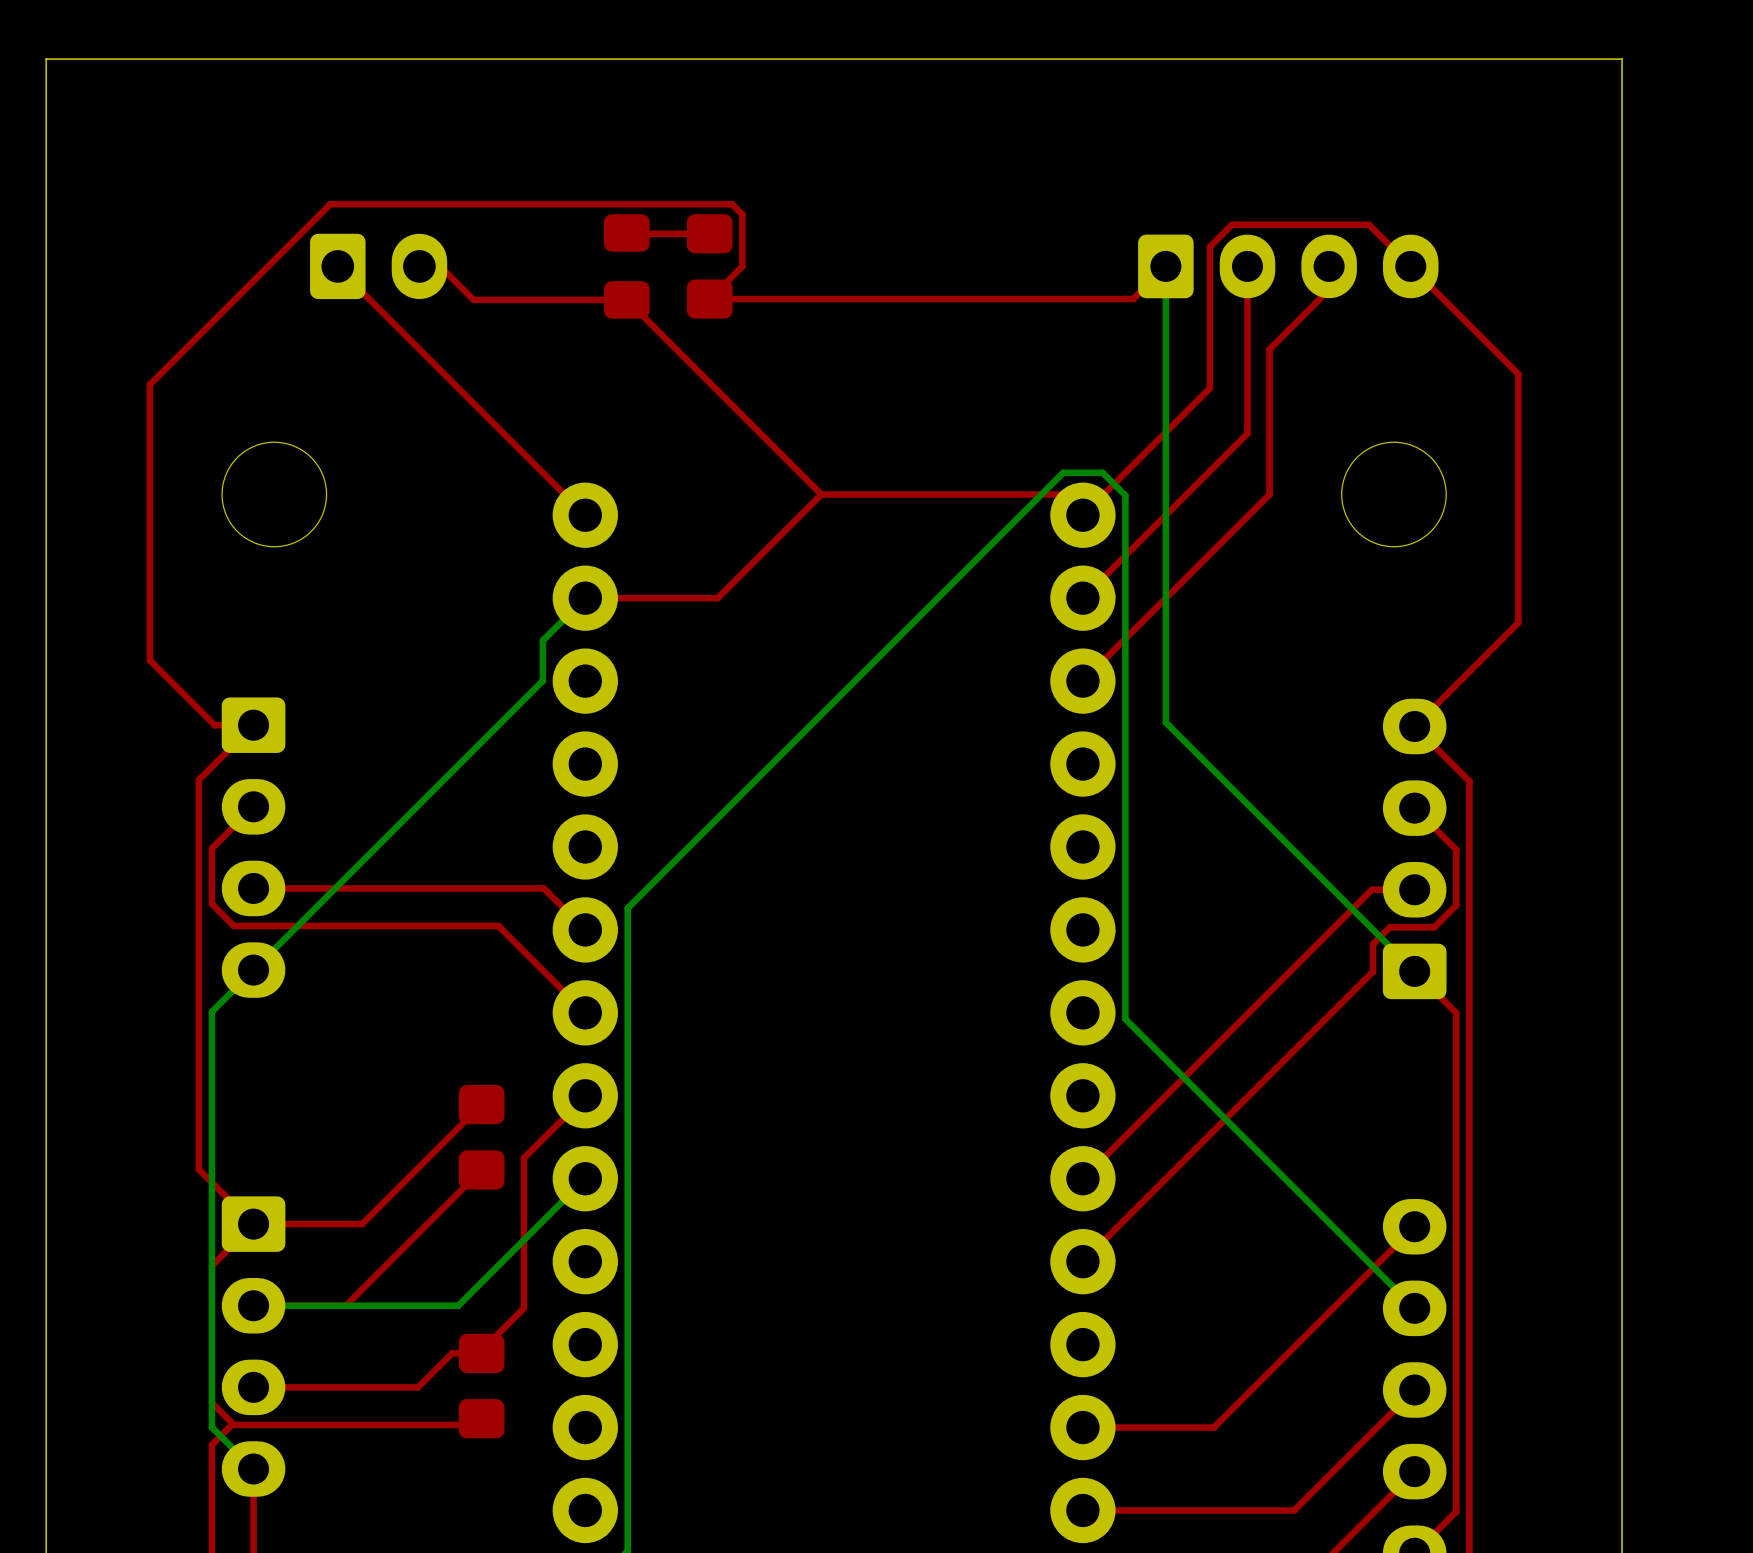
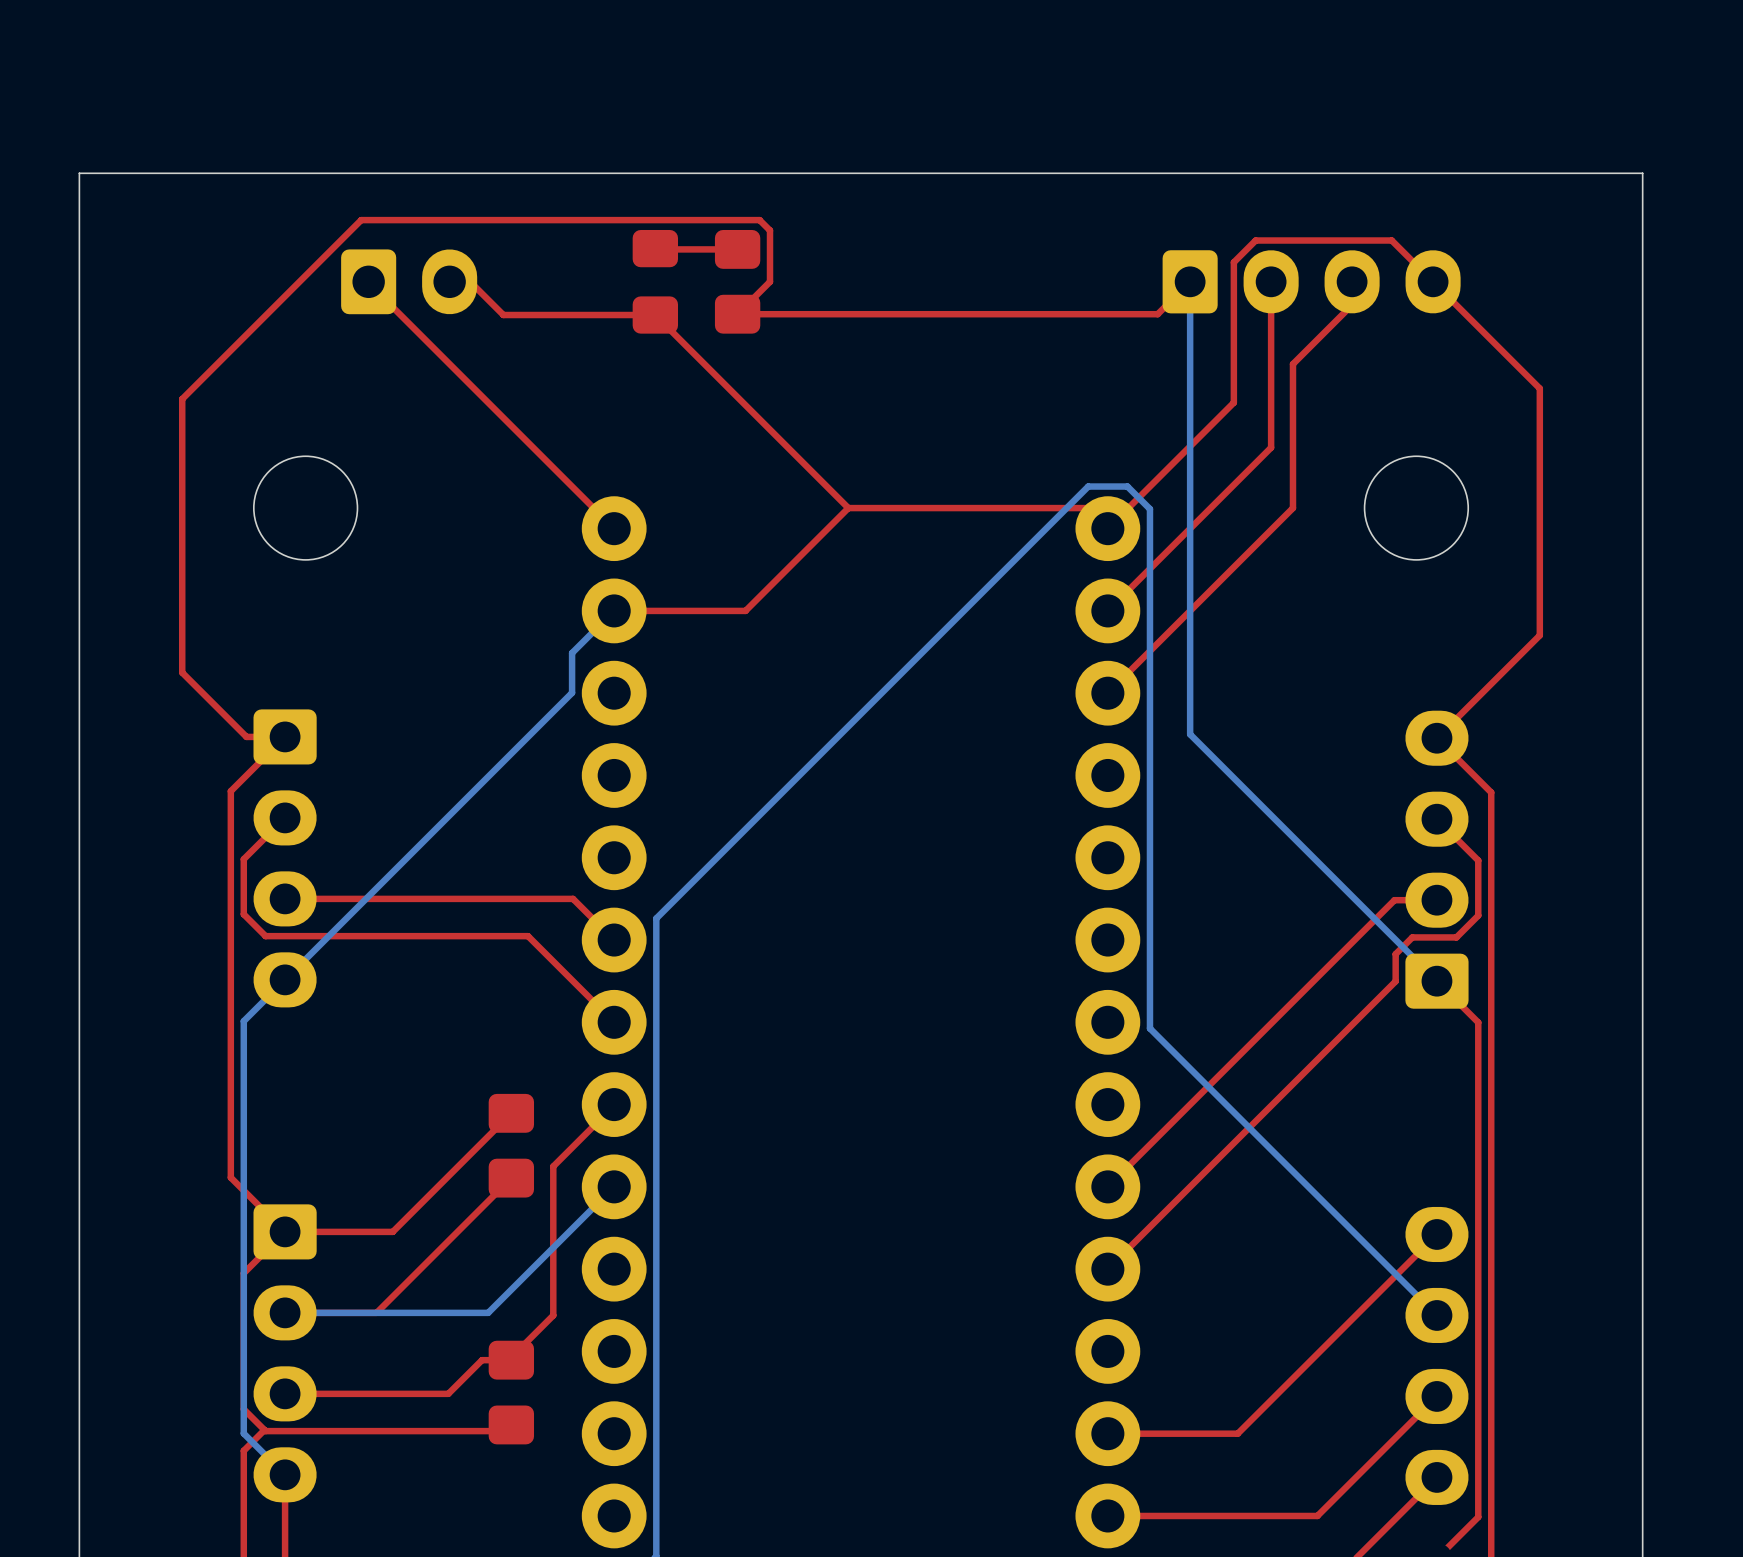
board edge: (1622, 157) (1622, 59) (46, 59) (46, 157) -> (1642, 173) (79, 173)

